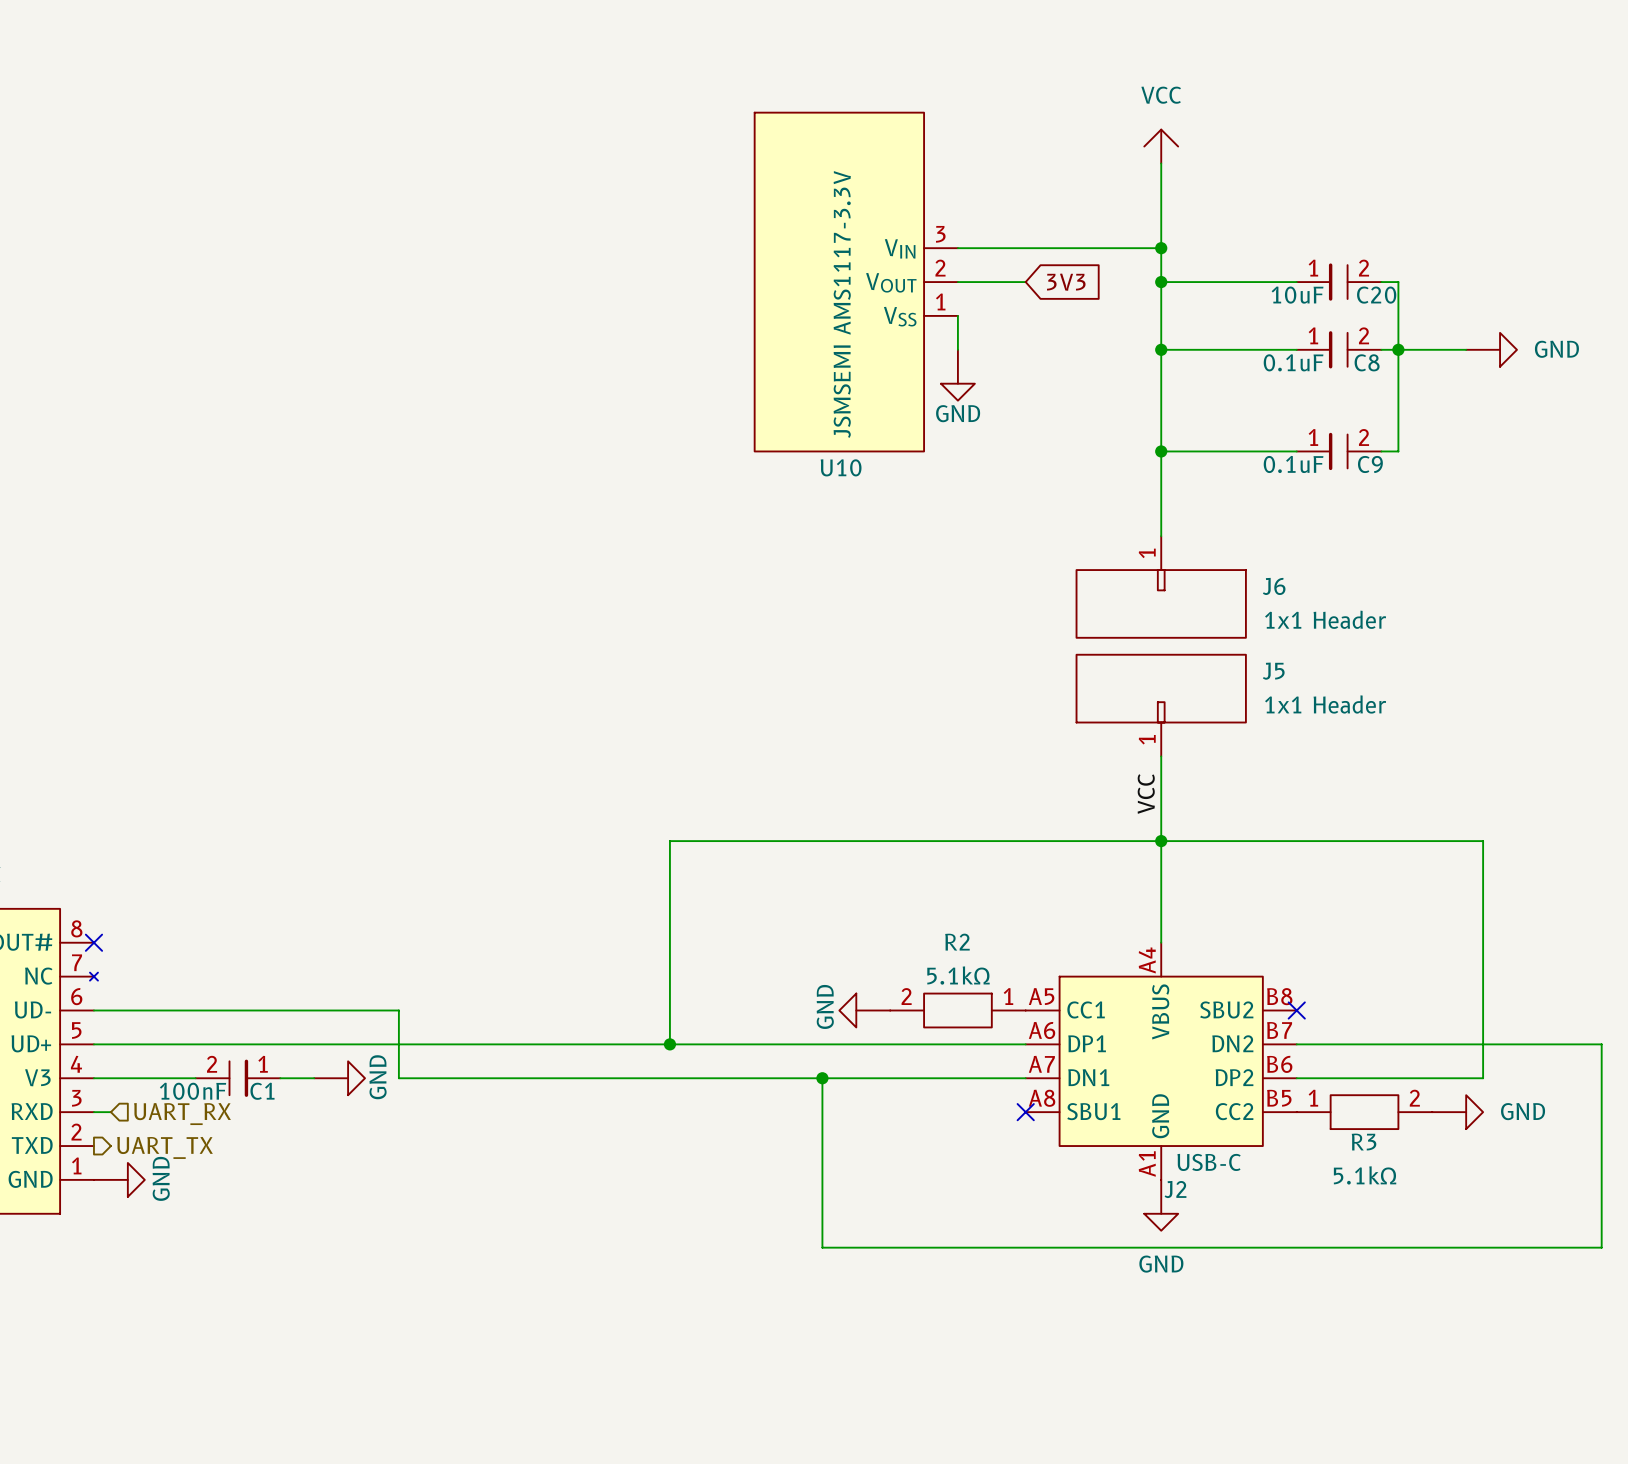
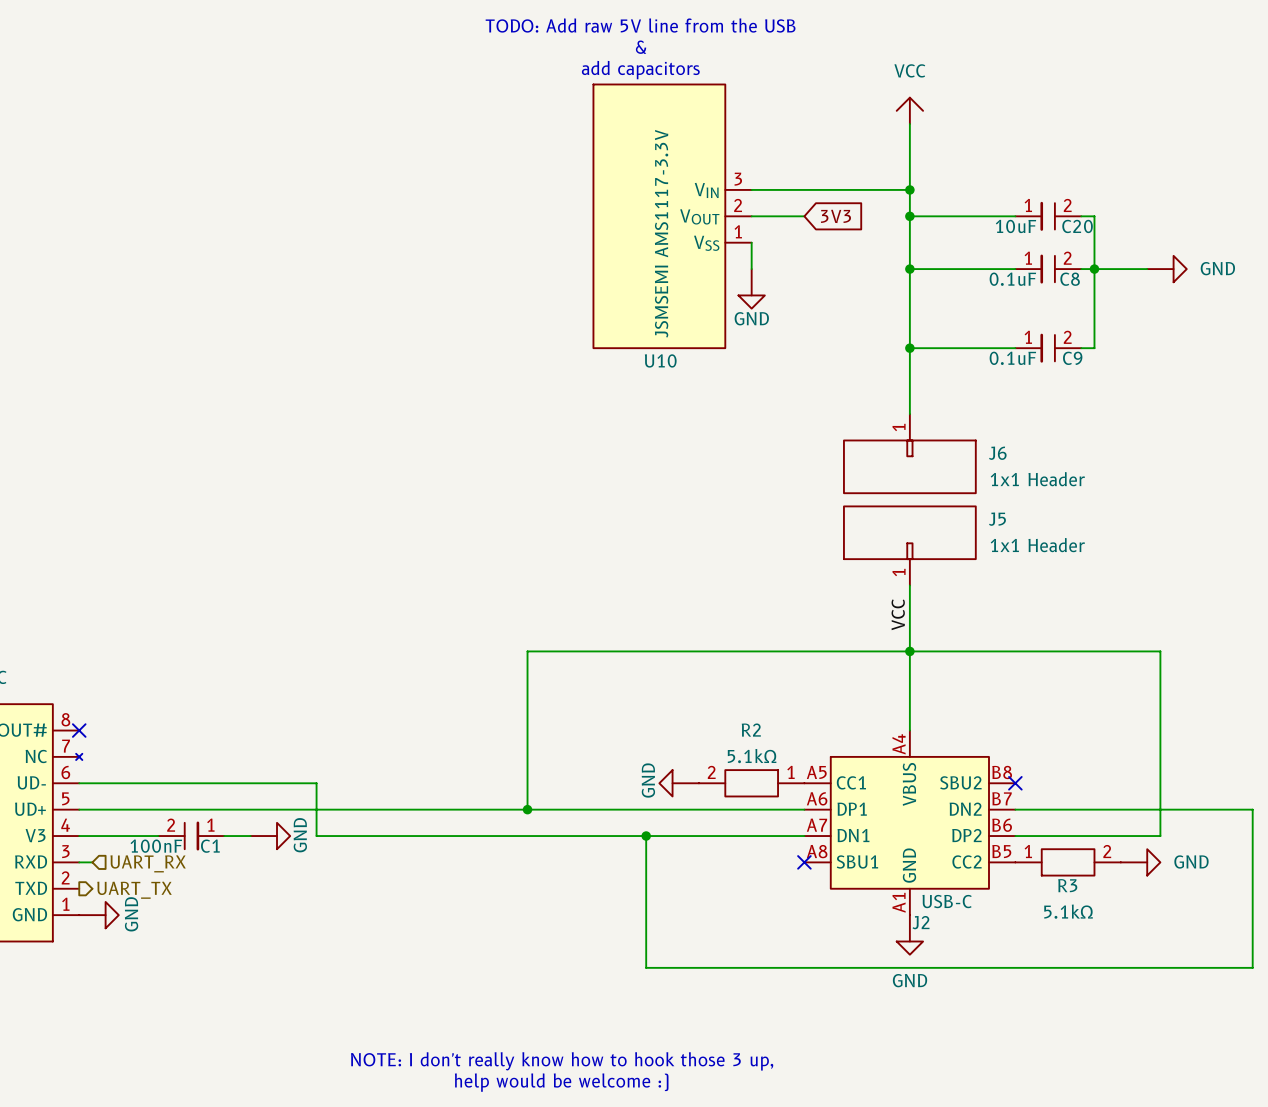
text: none -> TODO: Add raw 5V line from the USB (640, 25)
text: none -> & (641, 47)
text: none -> add capacitors (640, 70)
text: none -> NOTE: I don't really know how to hook those 3 up, (562, 1061)
text: none -> help would be welcome :) (561, 1082)

